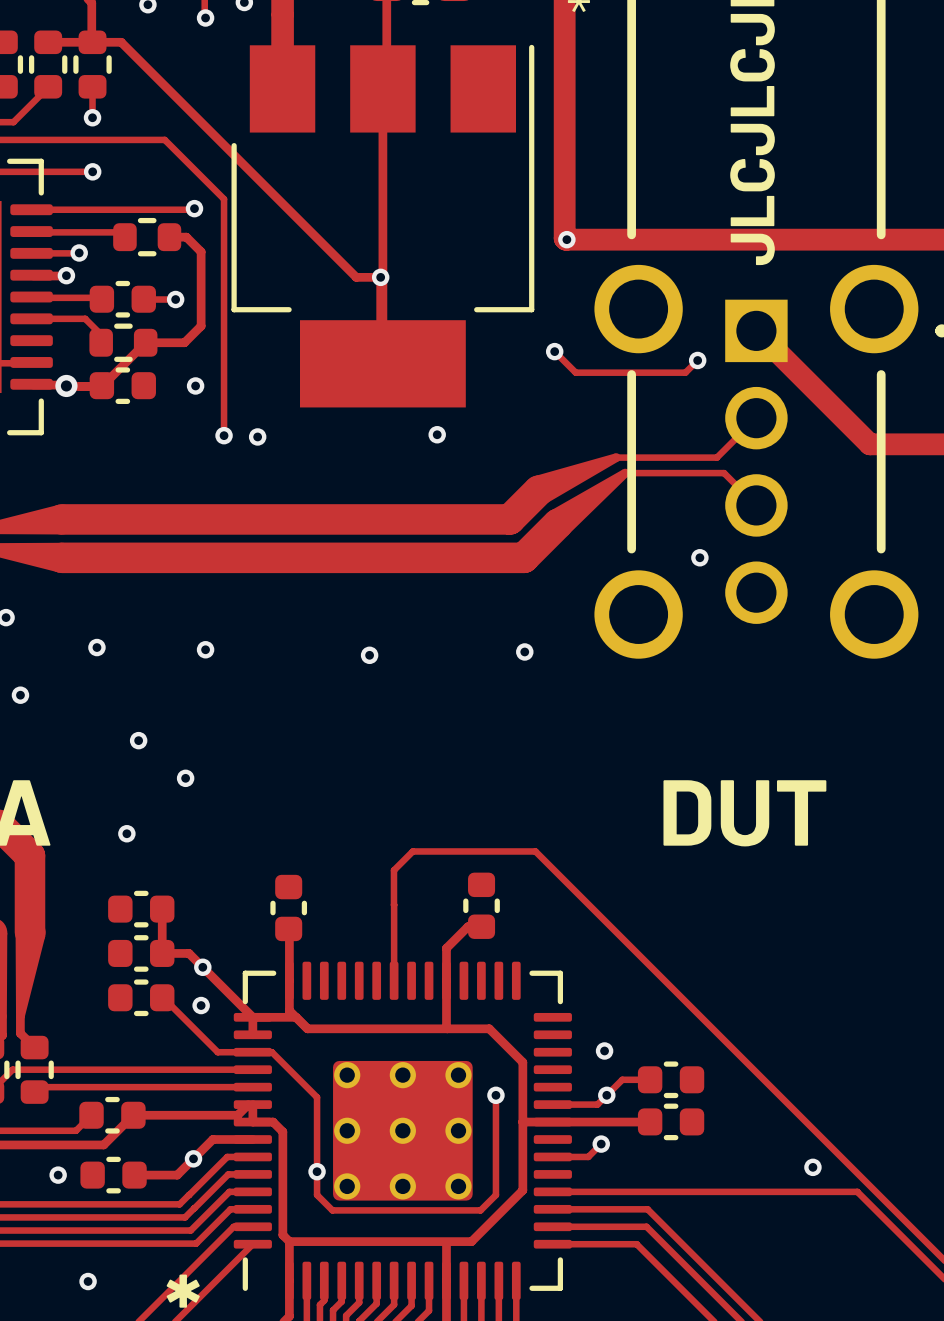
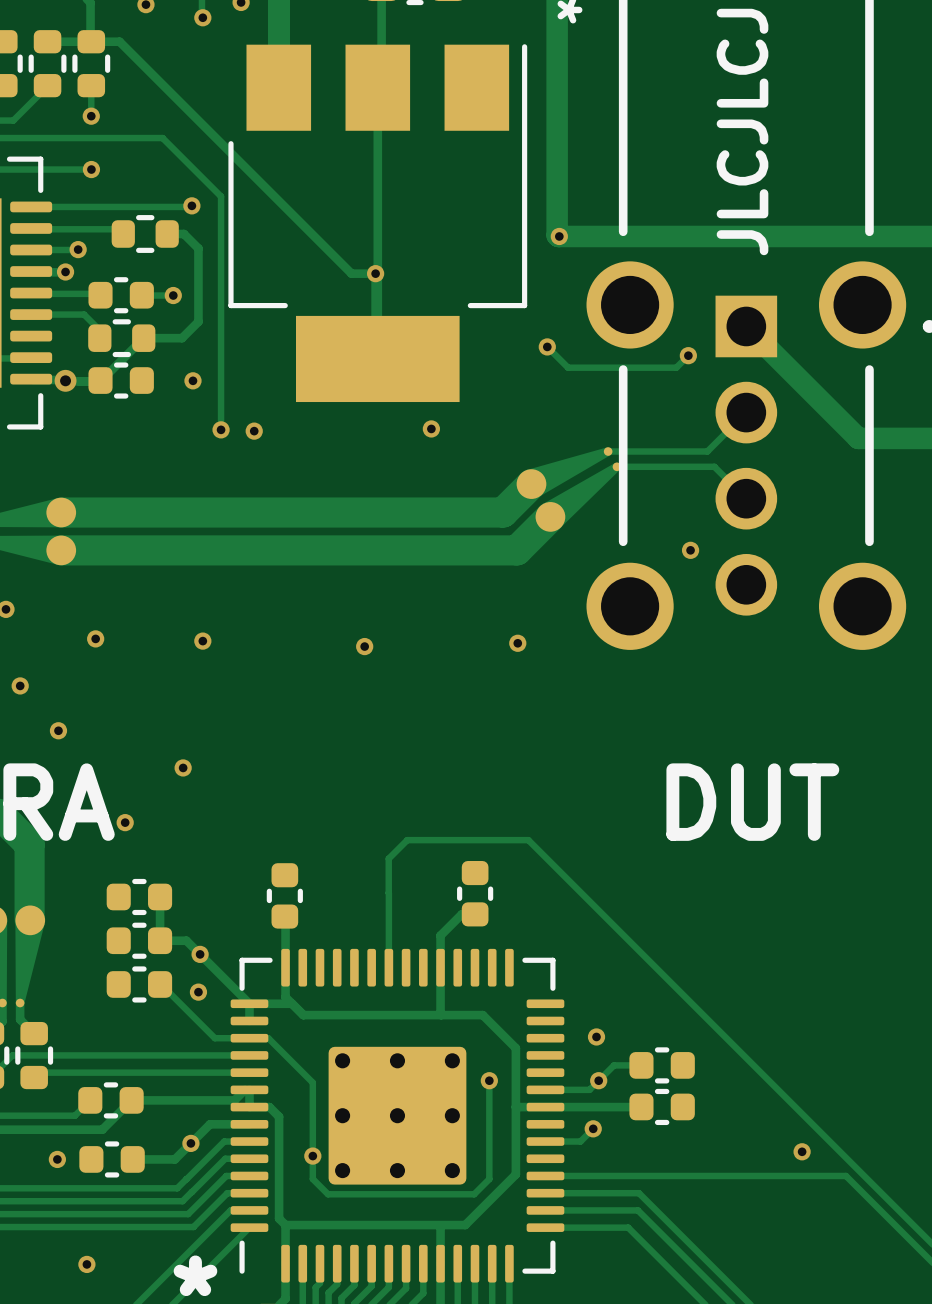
via position: (138, 740) -> (58, 730)

